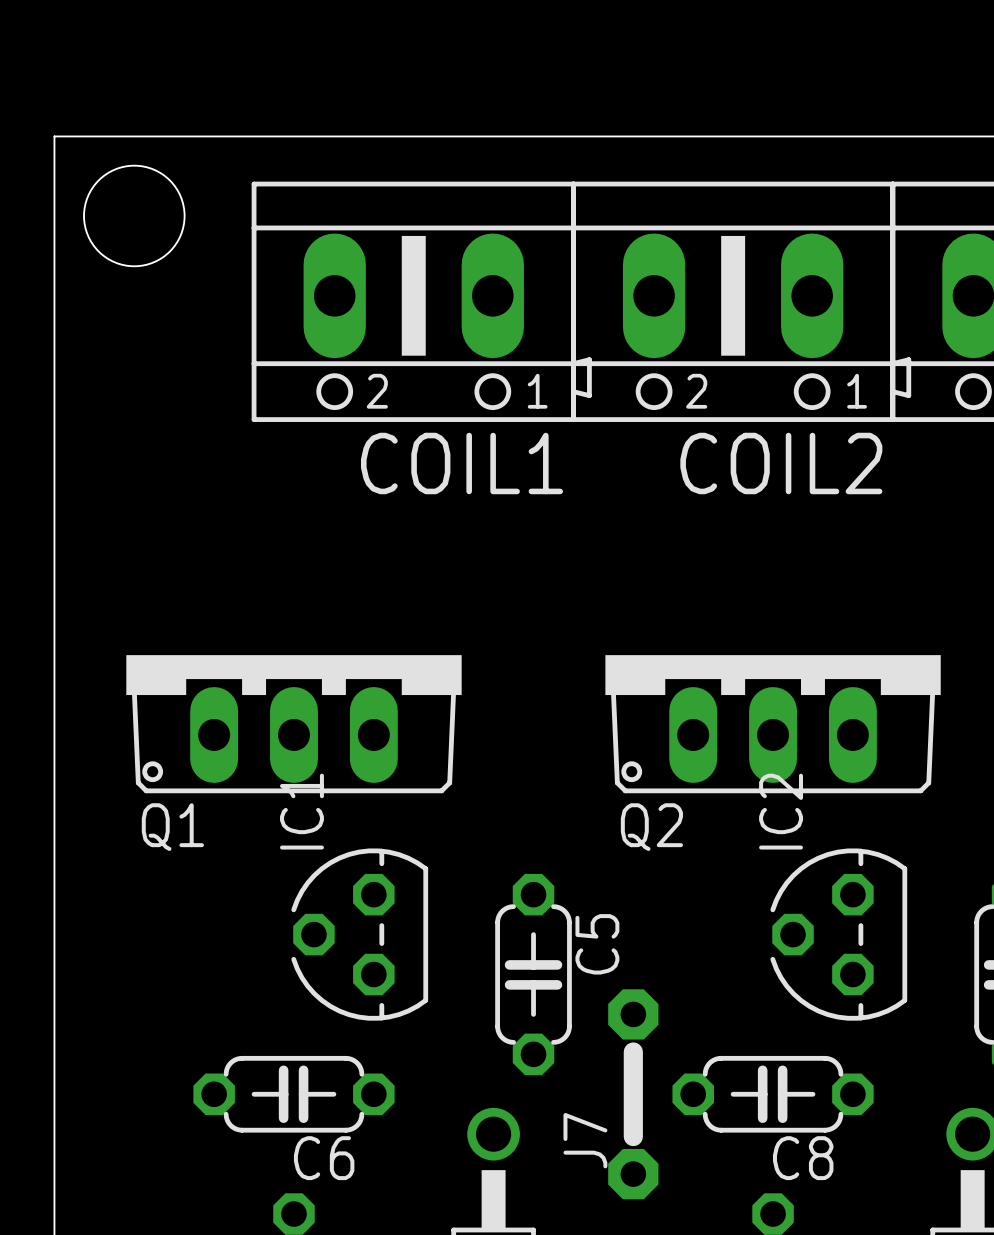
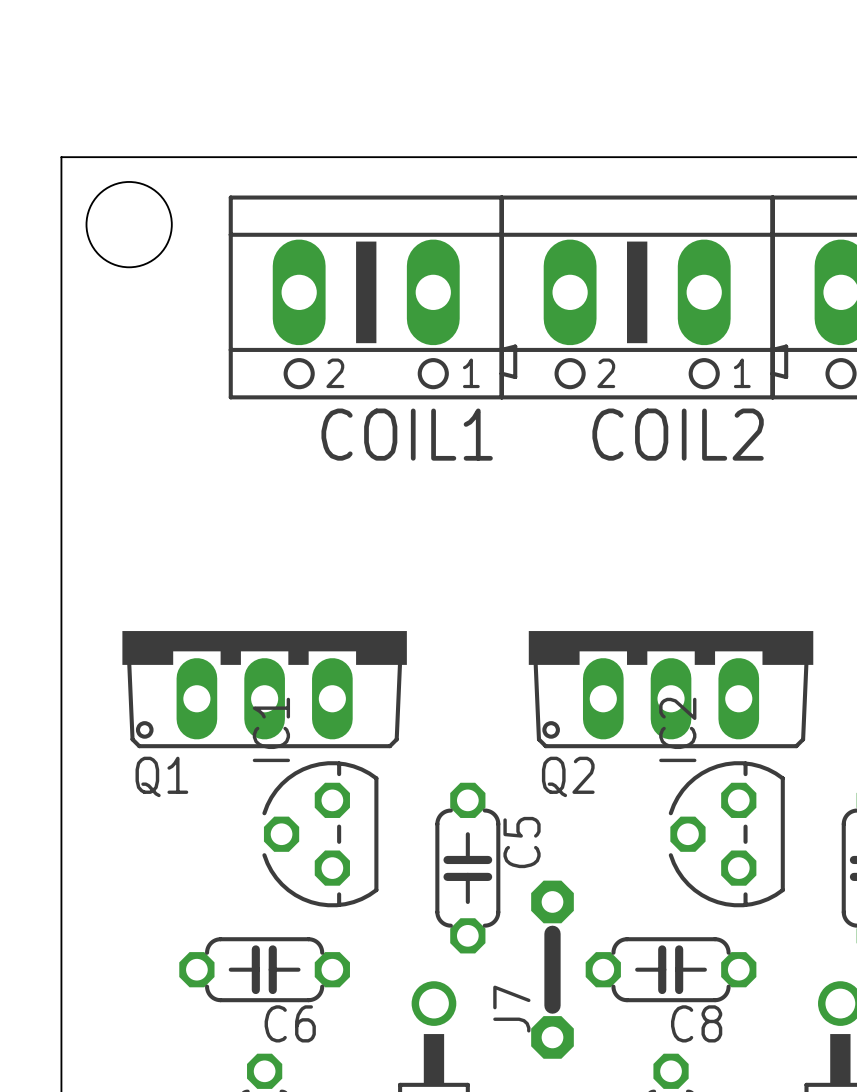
Q1 position: (293, 724) -> (264, 689)
Q2 position: (773, 724) -> (671, 689)

